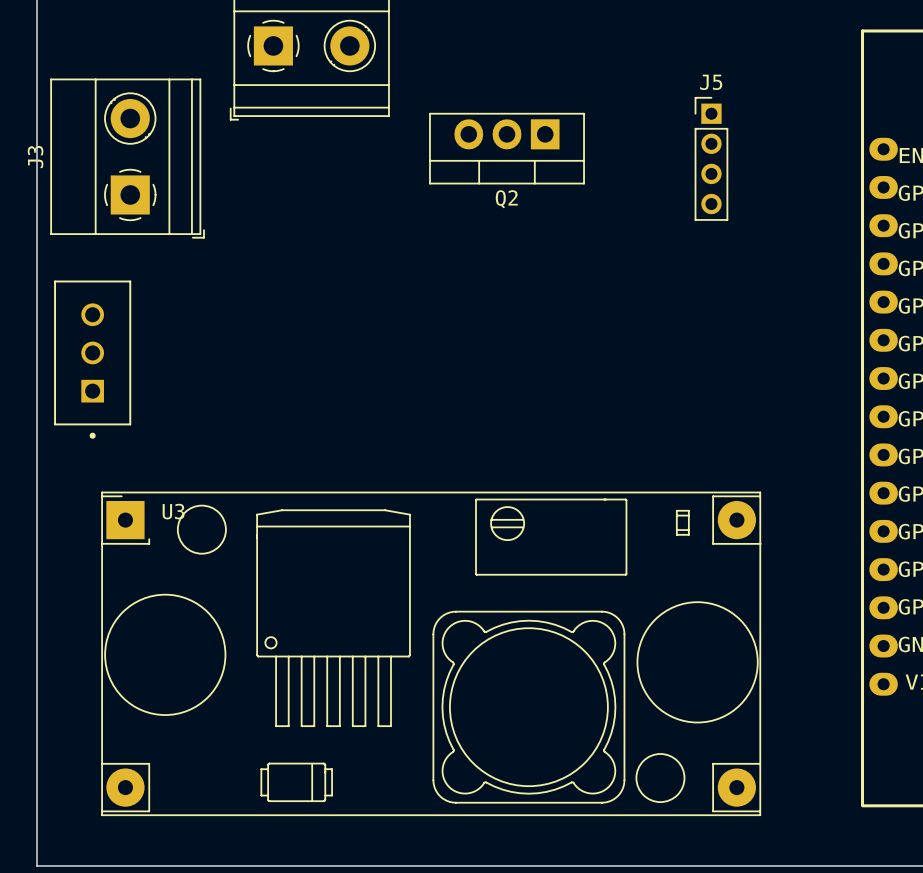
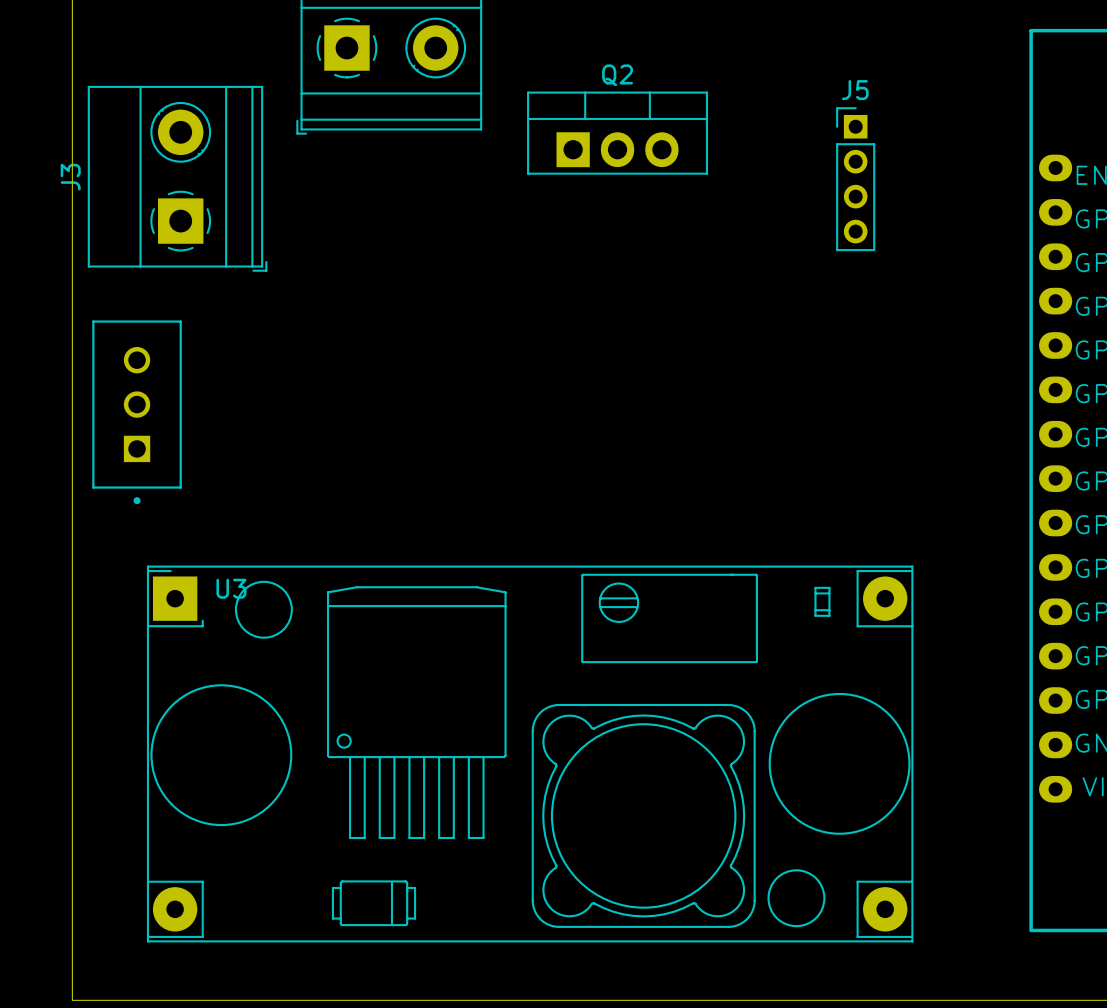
Q2 rotation: 0° (507, 148) -> 180° (617, 133)

